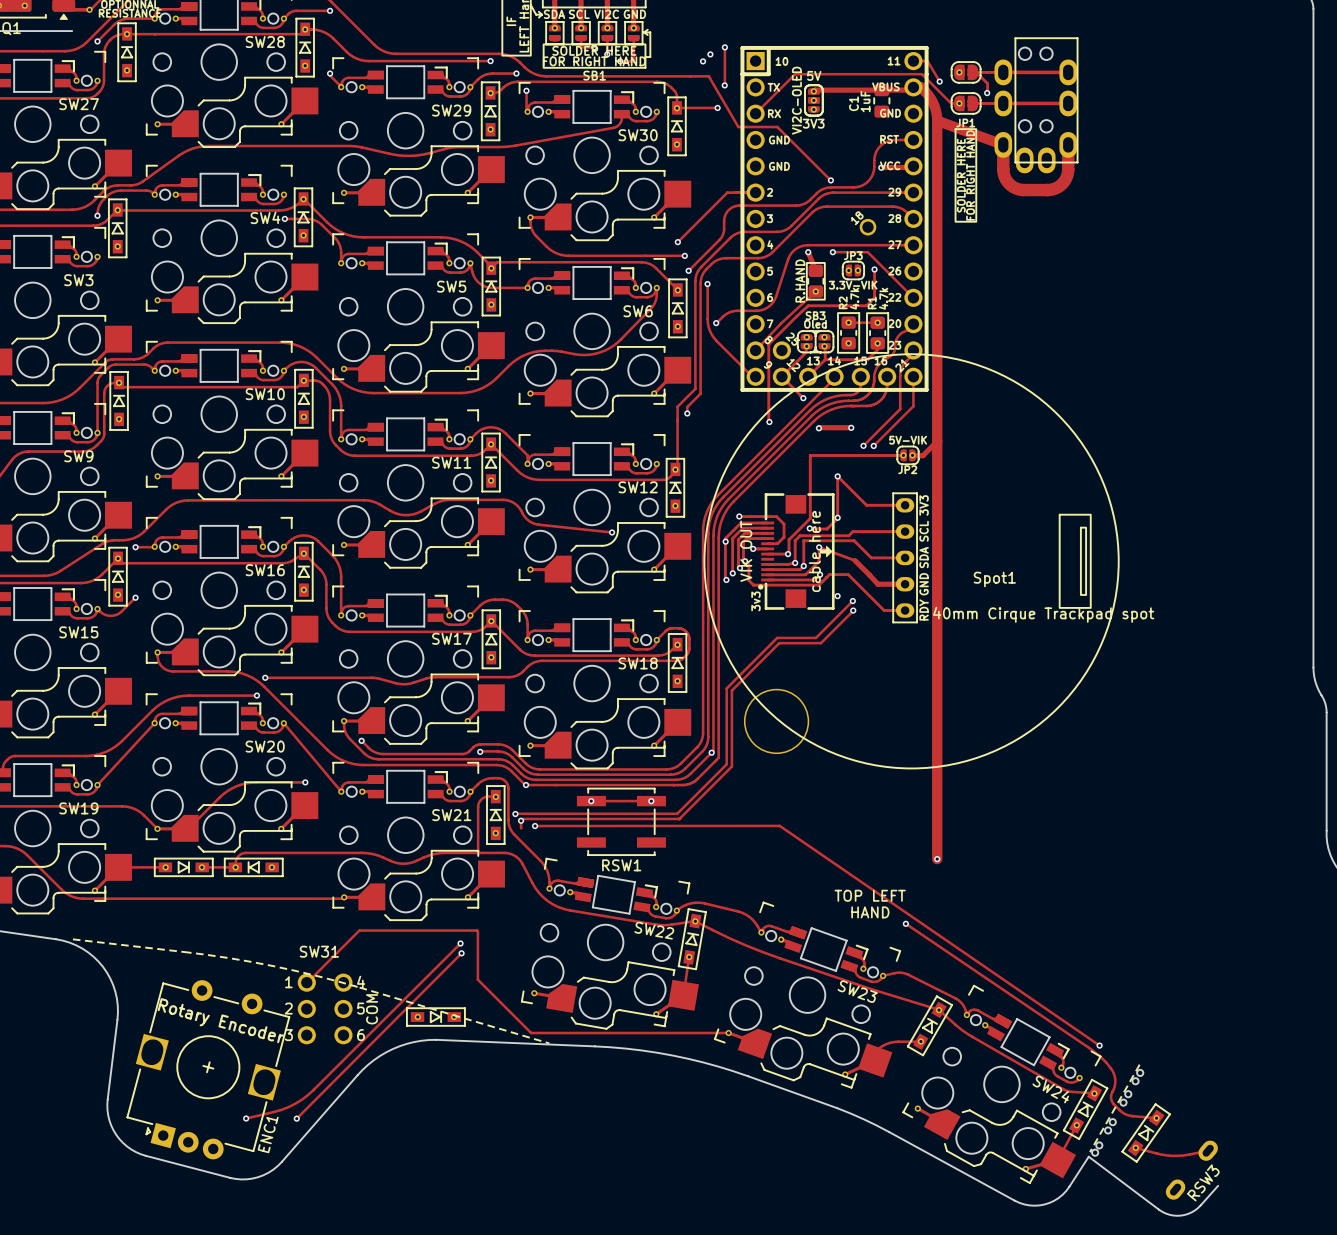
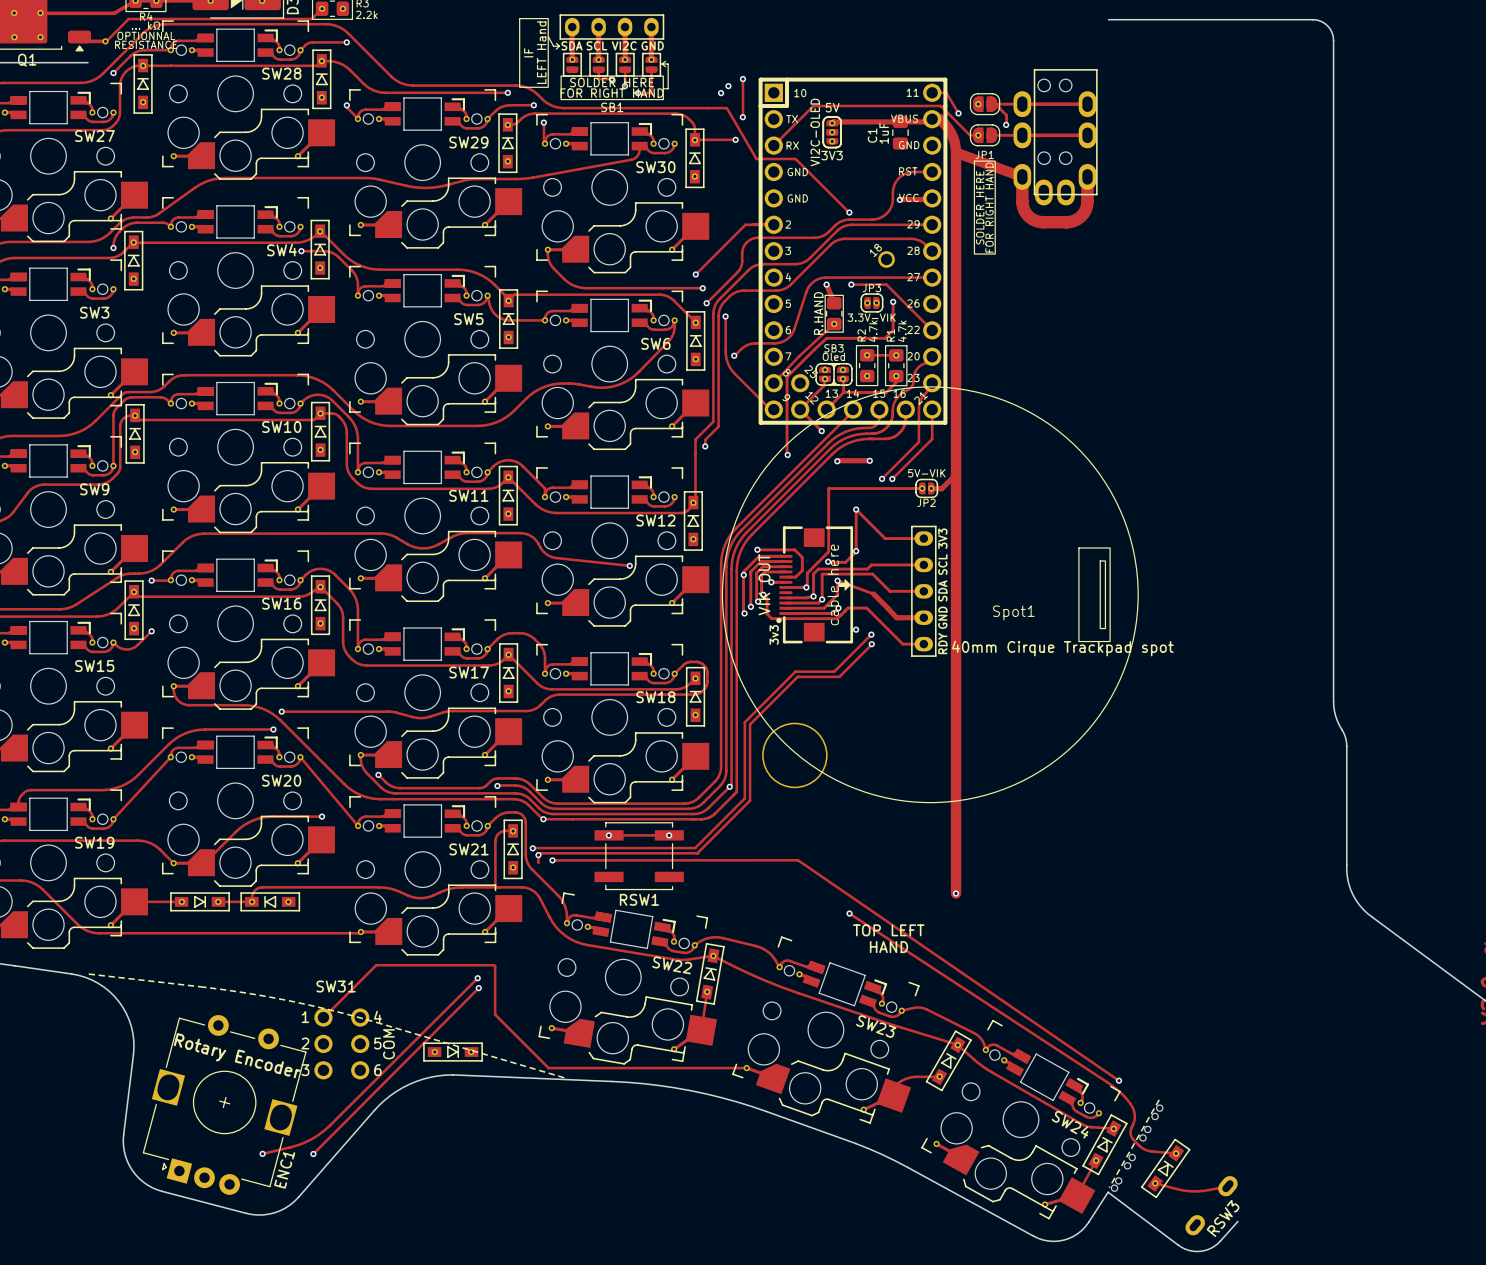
via: none -> (849, 913)
track: (905, 923) (1088, 1047) -> (849, 913) (1108, 1082)
via: (905, 923) -> none

